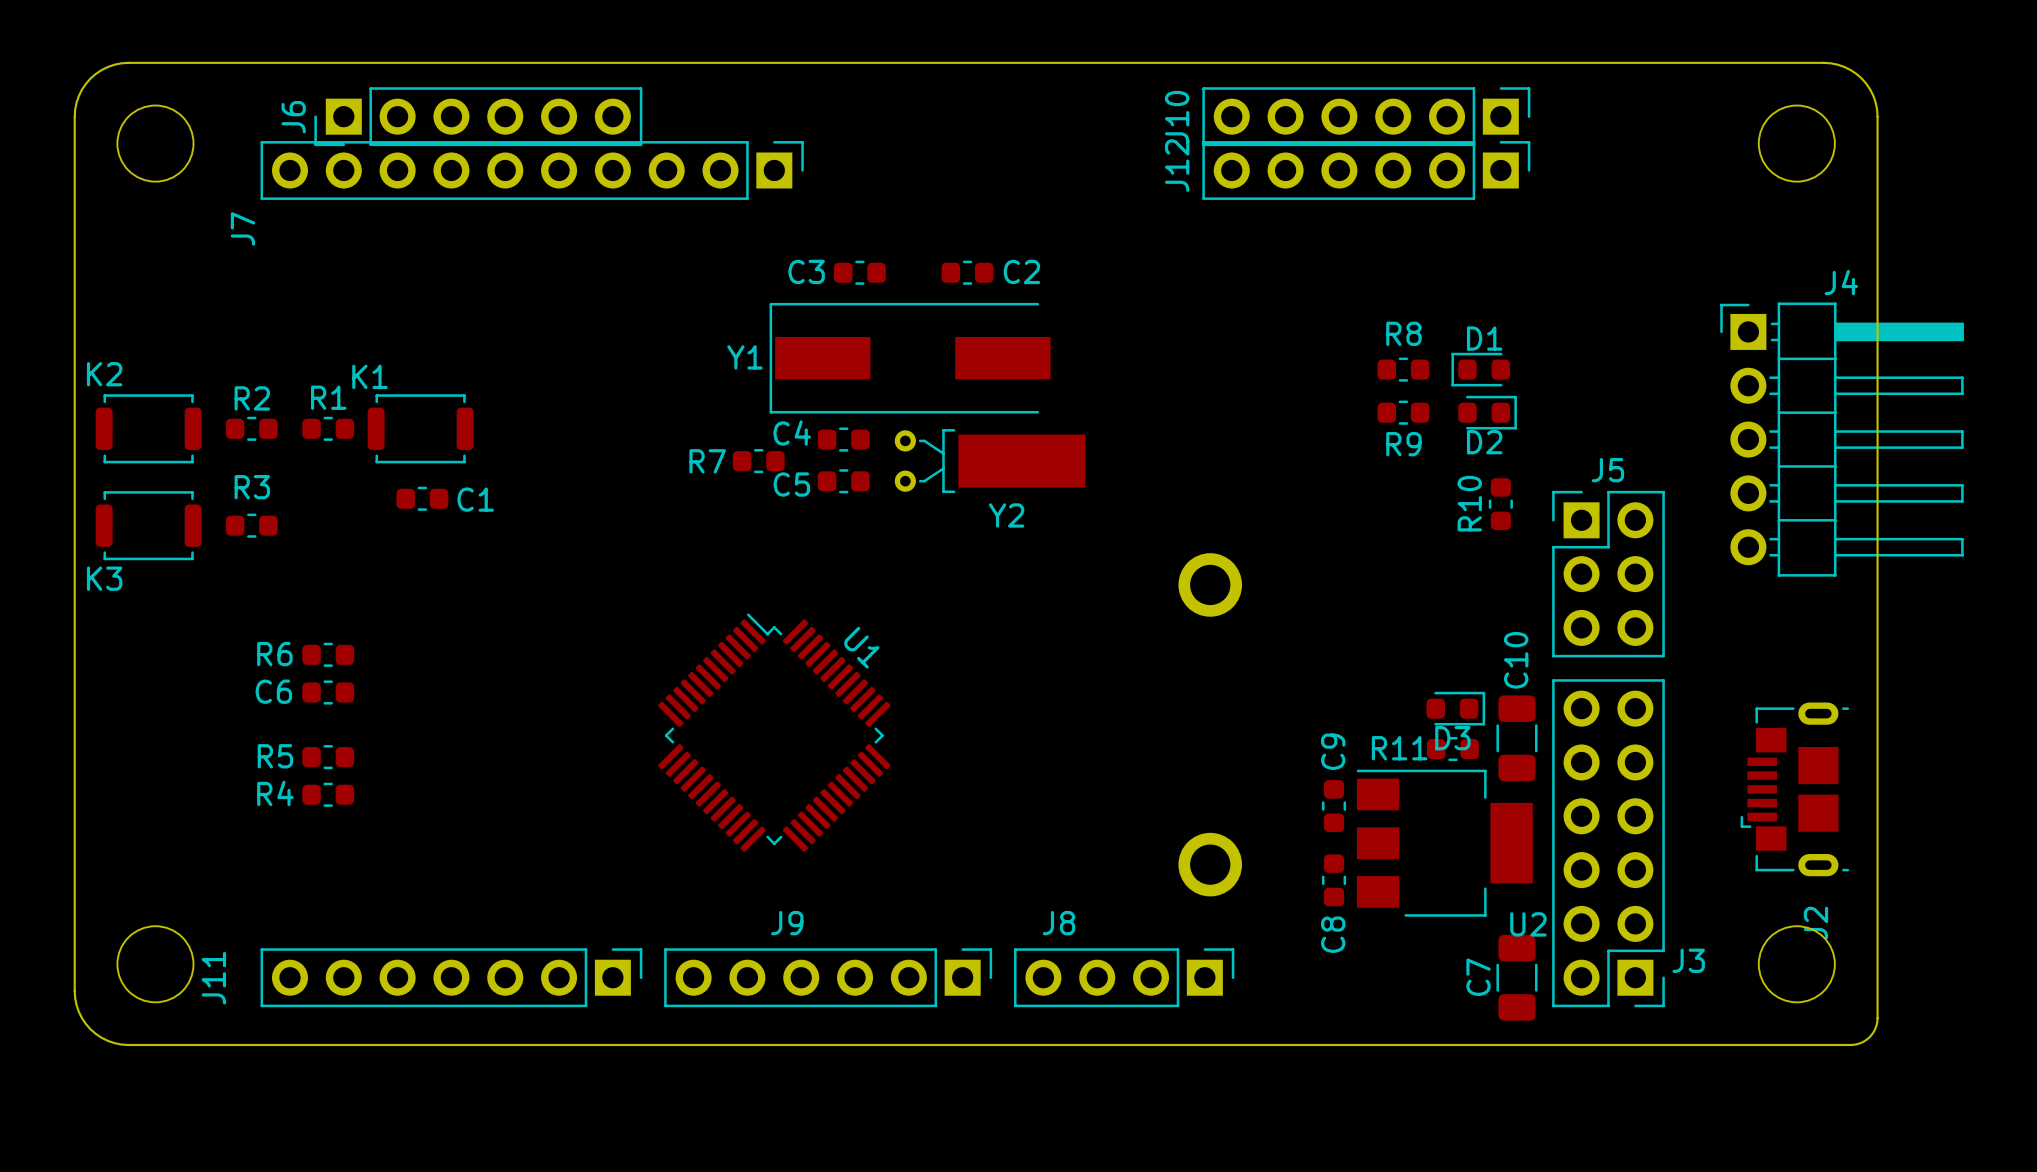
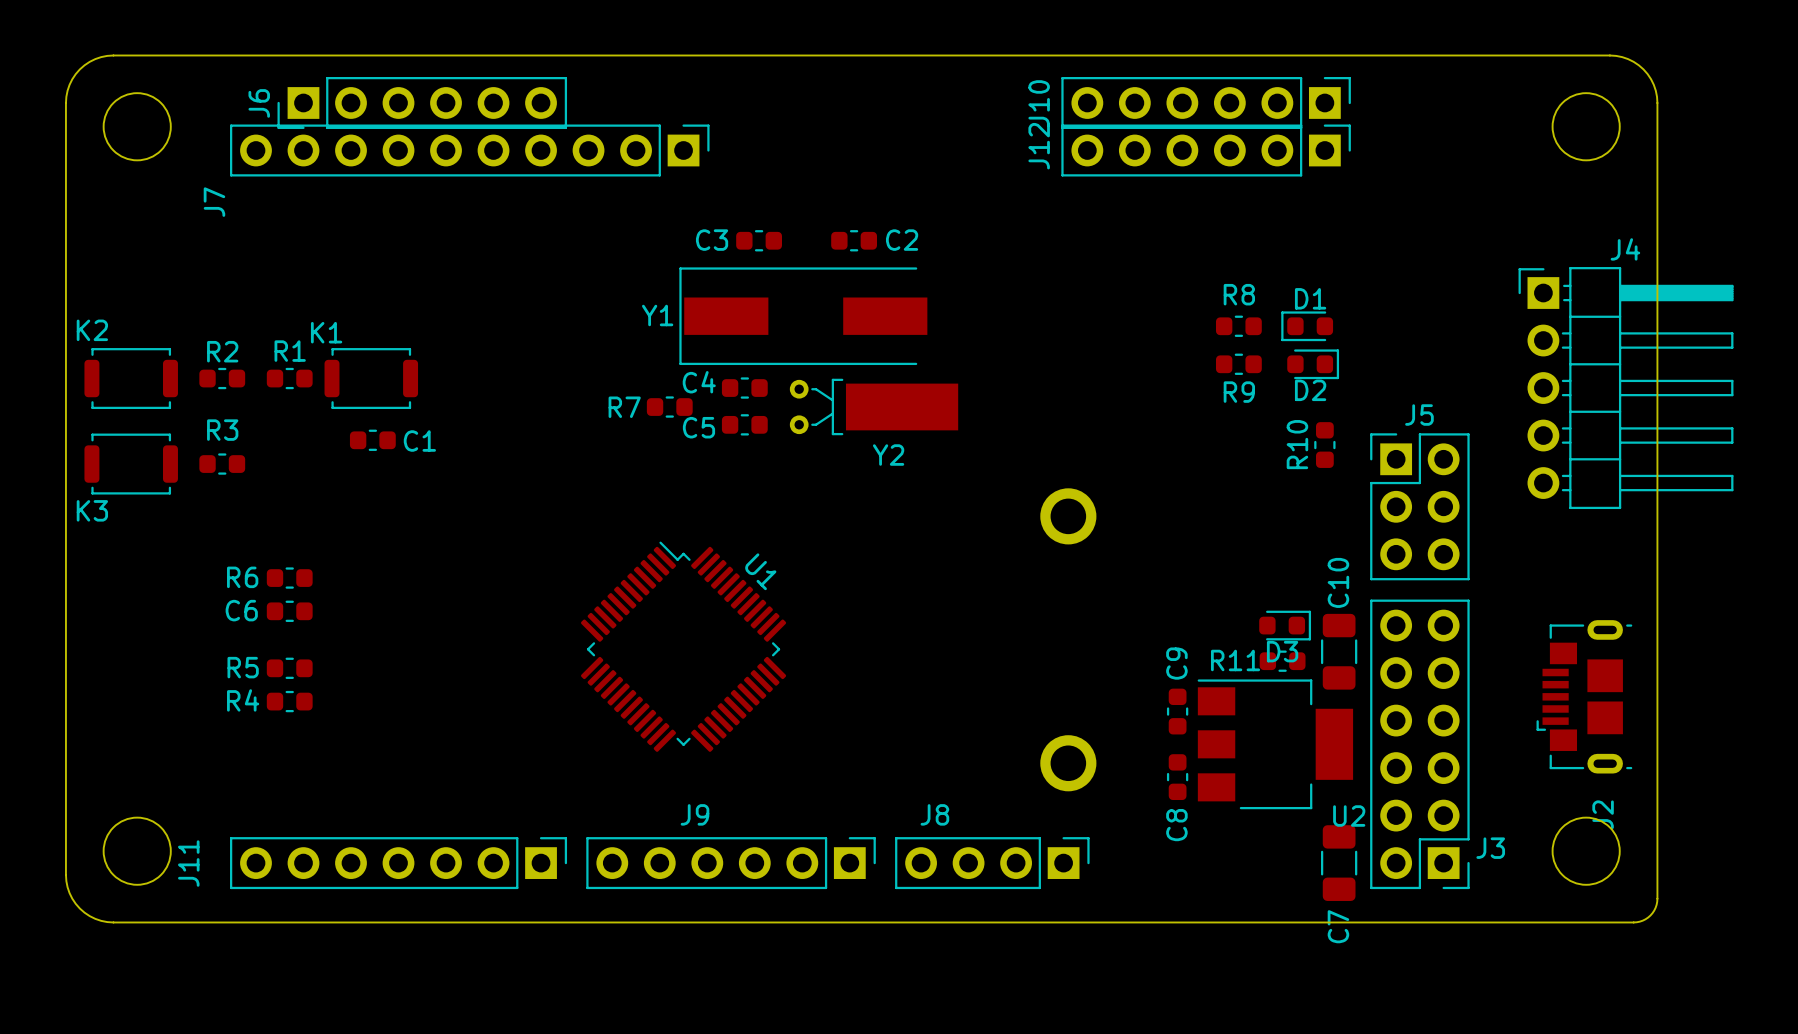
C7 name position: C7 (1478, 977) -> C7 (1338, 926)

